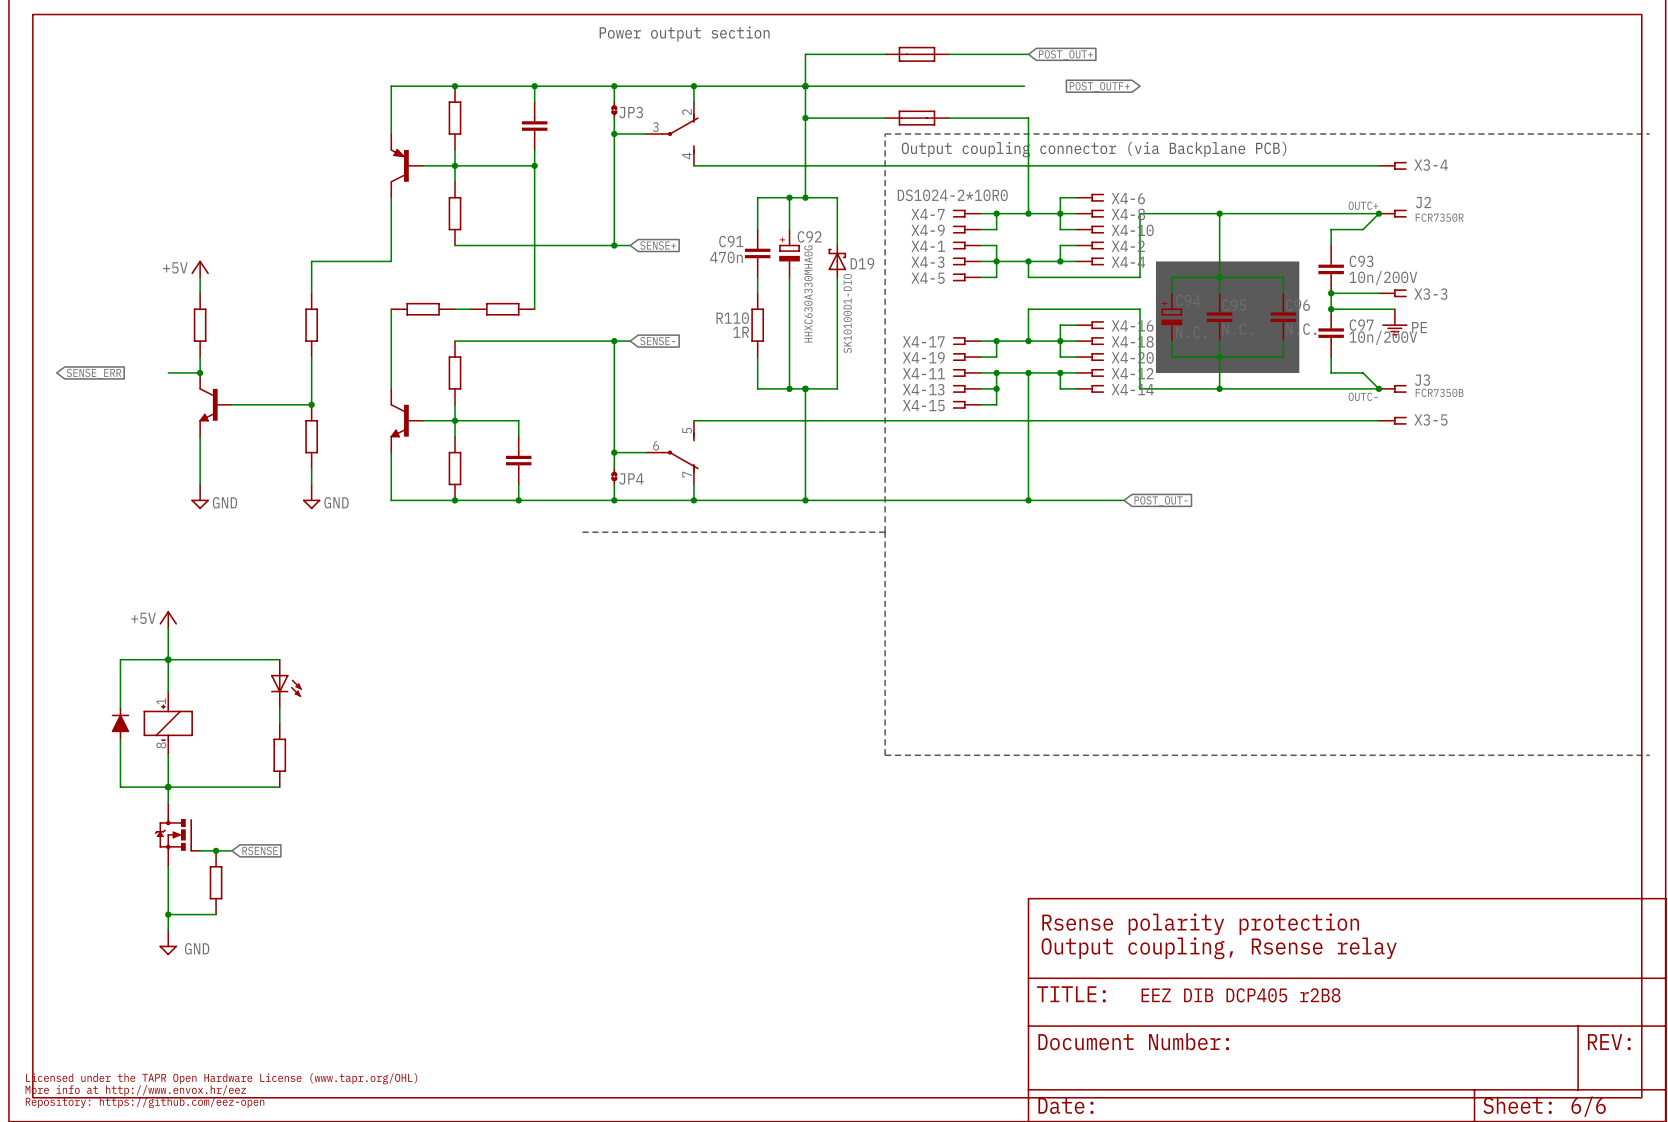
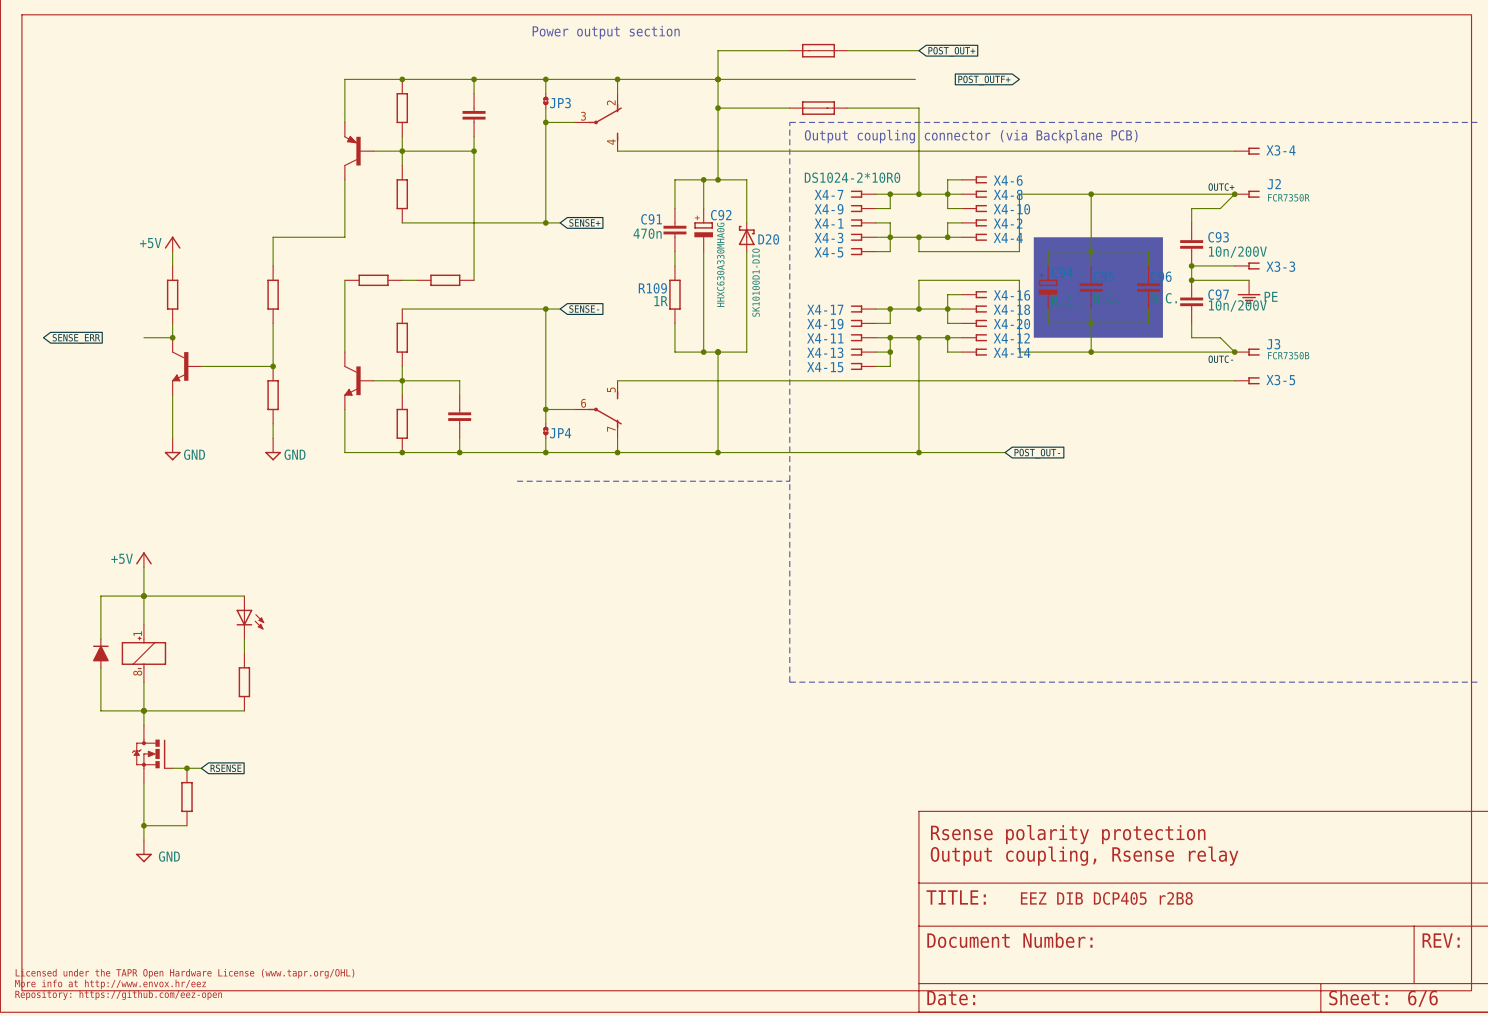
D19 name: D19 (862, 263) -> D20 (768, 239)
R110 name: R110 (732, 318) -> R109 (652, 288)

